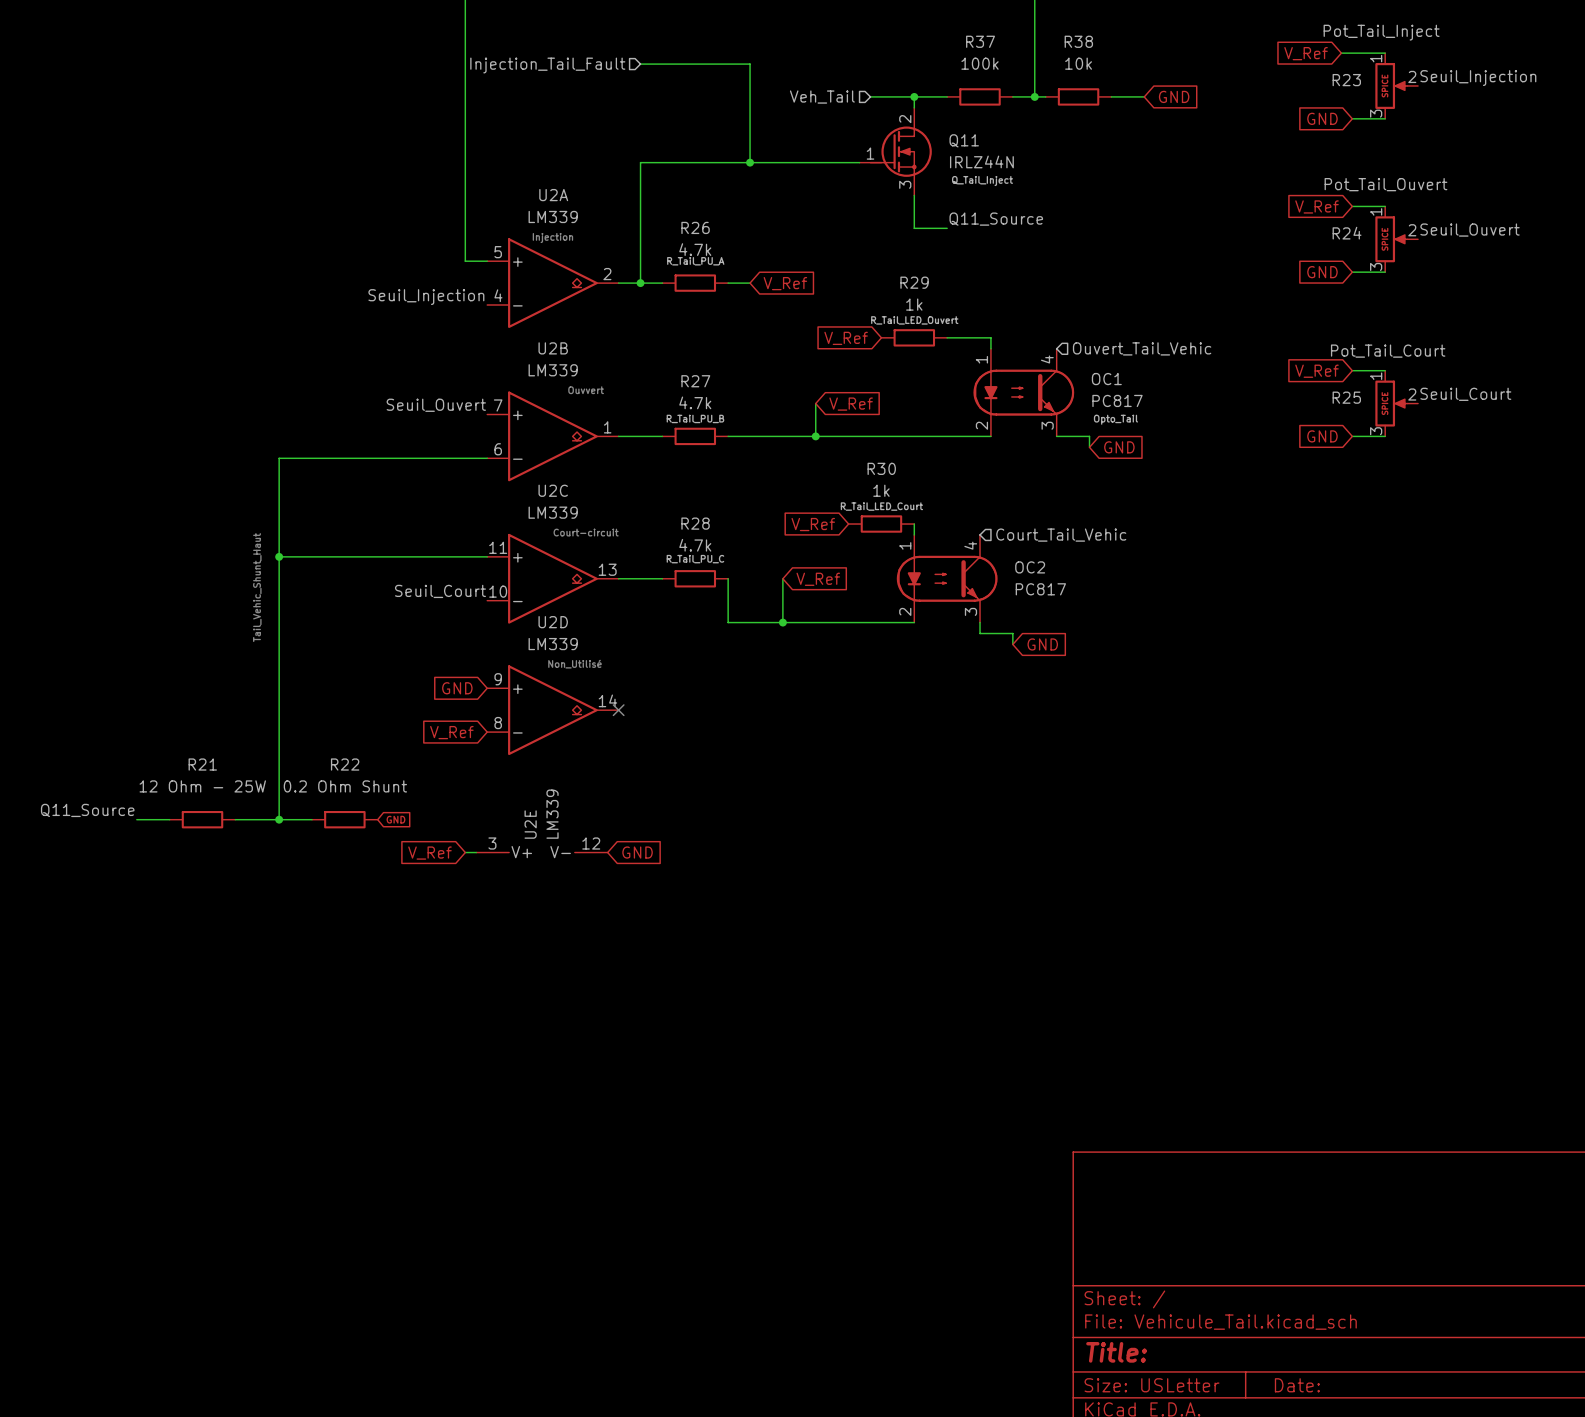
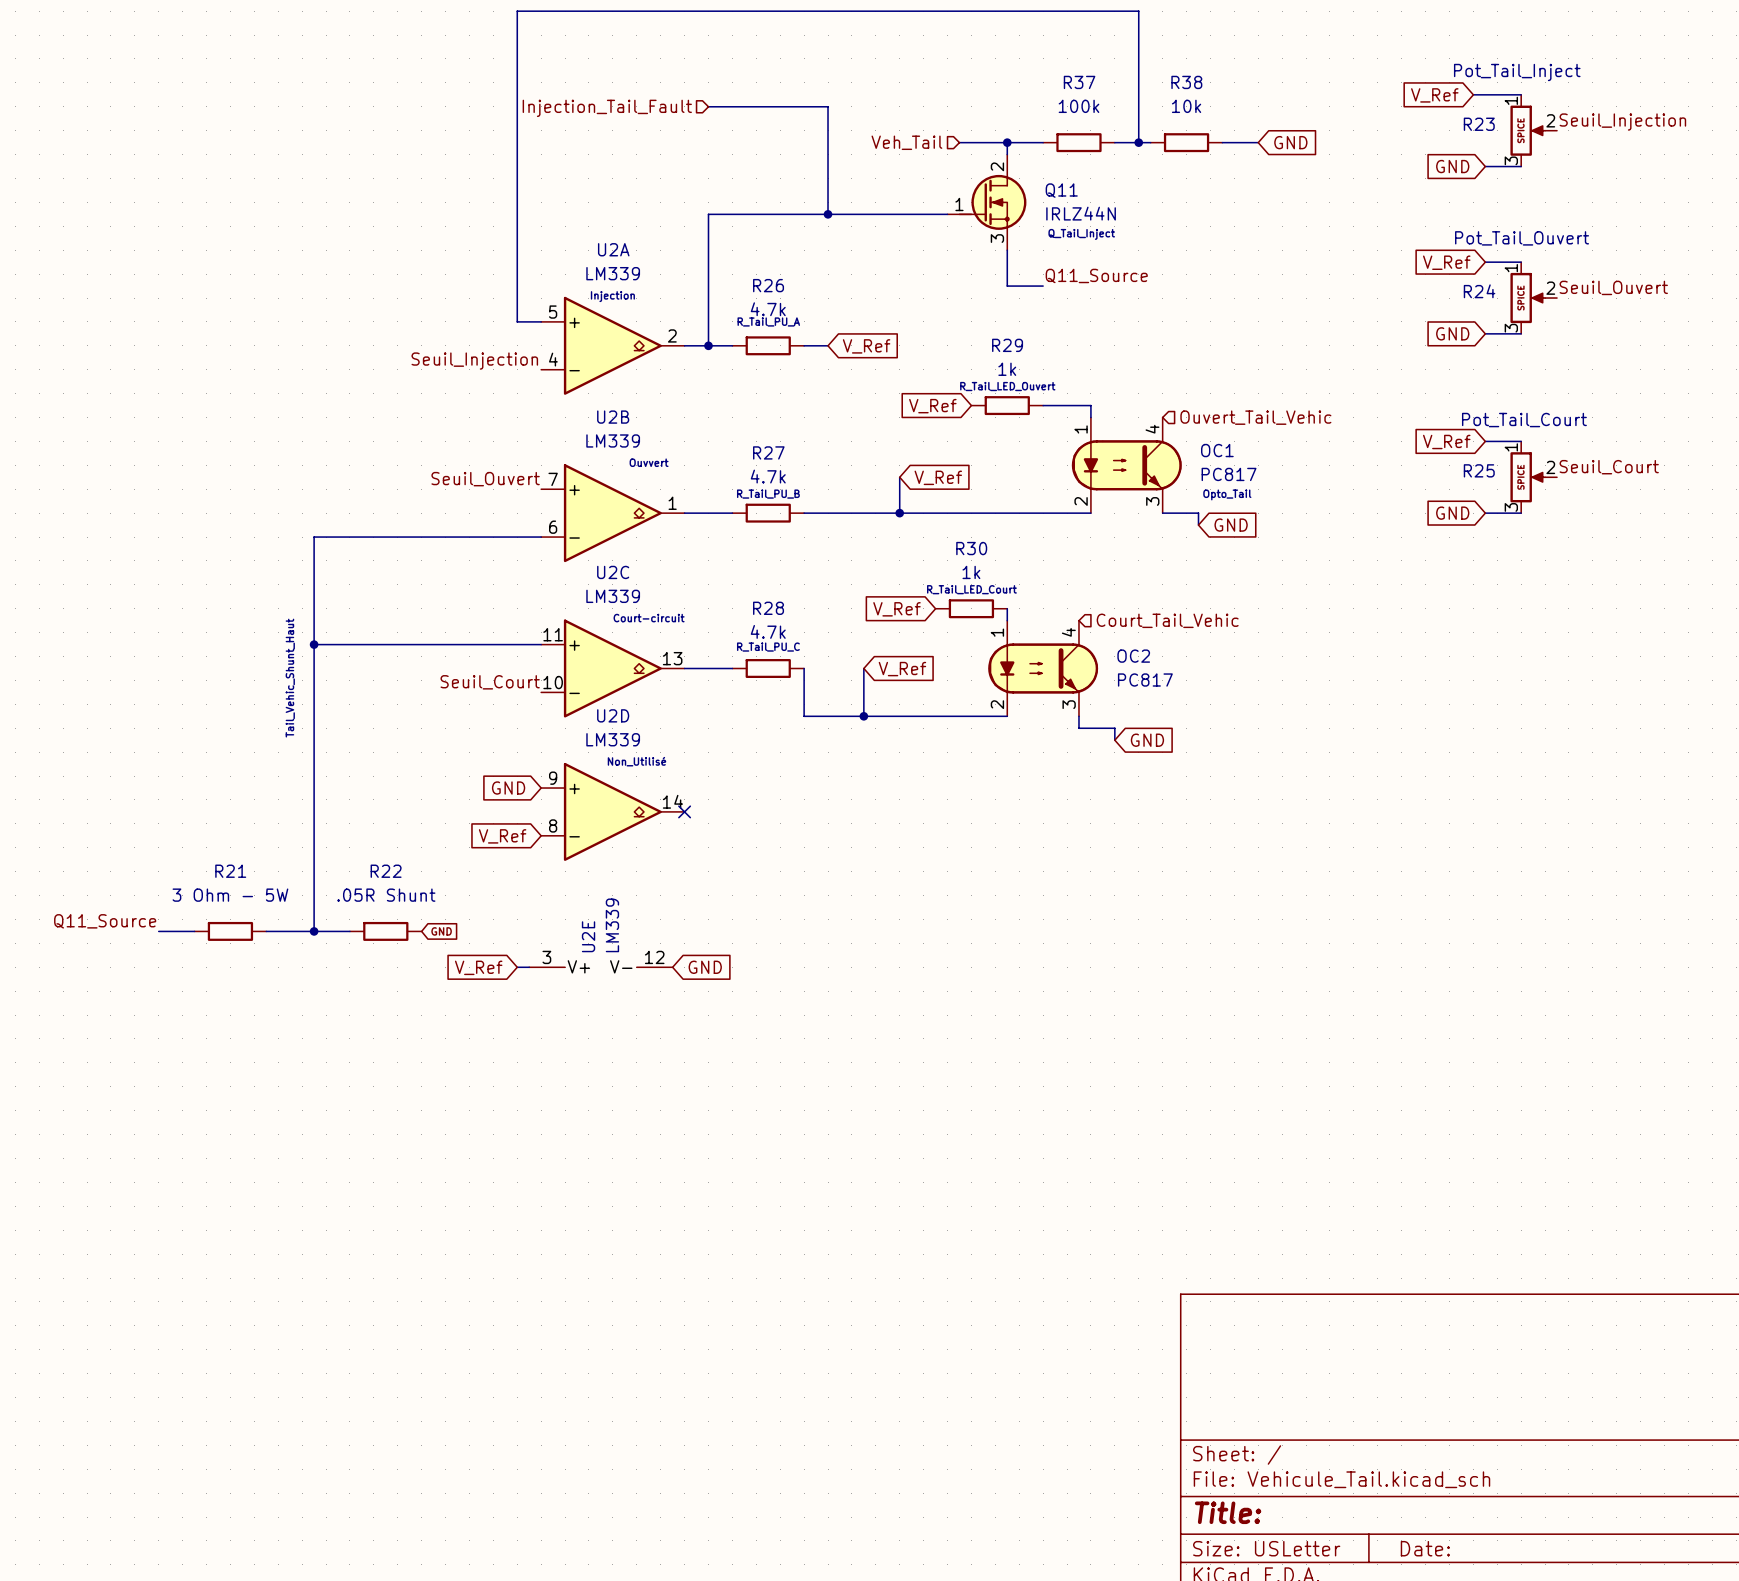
R21 value: 12 Ohm - 25W (202, 786) -> 3 Ohm - 5W (230, 895)
R22 value: 0.2 Ohm Shunt (345, 786) -> .05R Shunt (386, 895)

